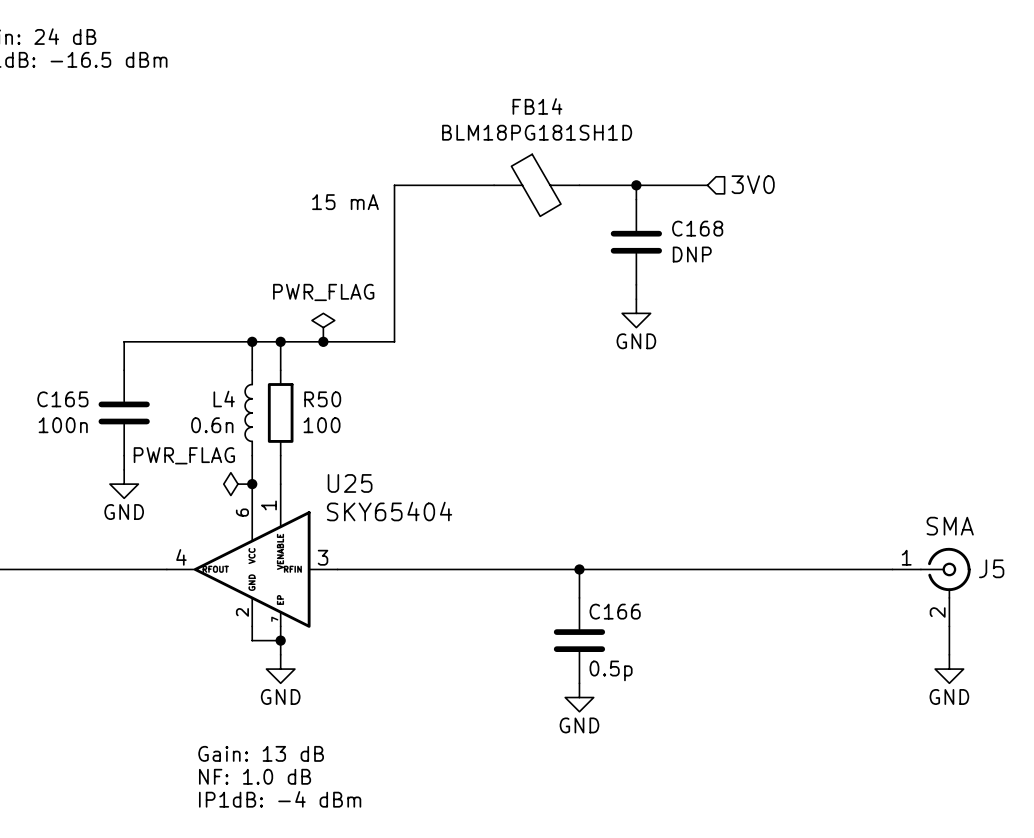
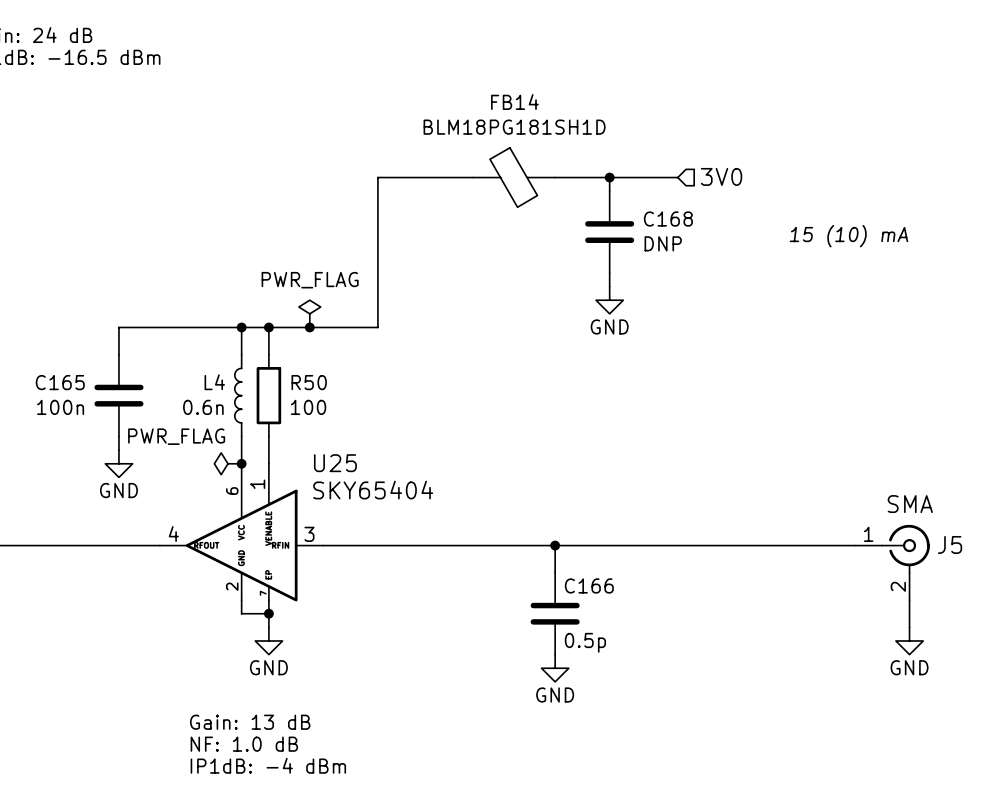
text: 15 mA (345, 202) -> none
text: none -> 15 (10) mA (848, 236)

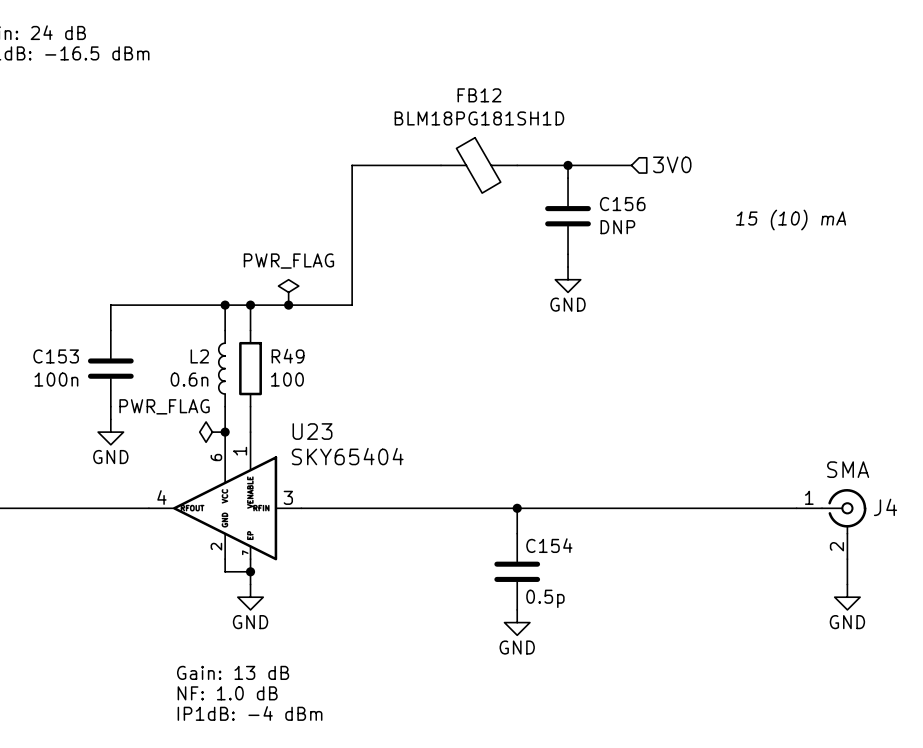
FB14 name: FB14 (514, 102) -> FB12 (479, 95)
C168 name: C168 (668, 219) -> C156 (622, 204)
C165 name: C165 (60, 382) -> C153 (56, 356)
L4 name: L4 (214, 382) -> L2 (199, 356)
R50 name: R50 (309, 382) -> R49 (288, 356)
U25 name: U25 (335, 463) -> U23 (312, 431)
J5 name: J5 (950, 544) -> J4 (885, 507)
C166 name: C166 (589, 585) -> C154 (549, 545)

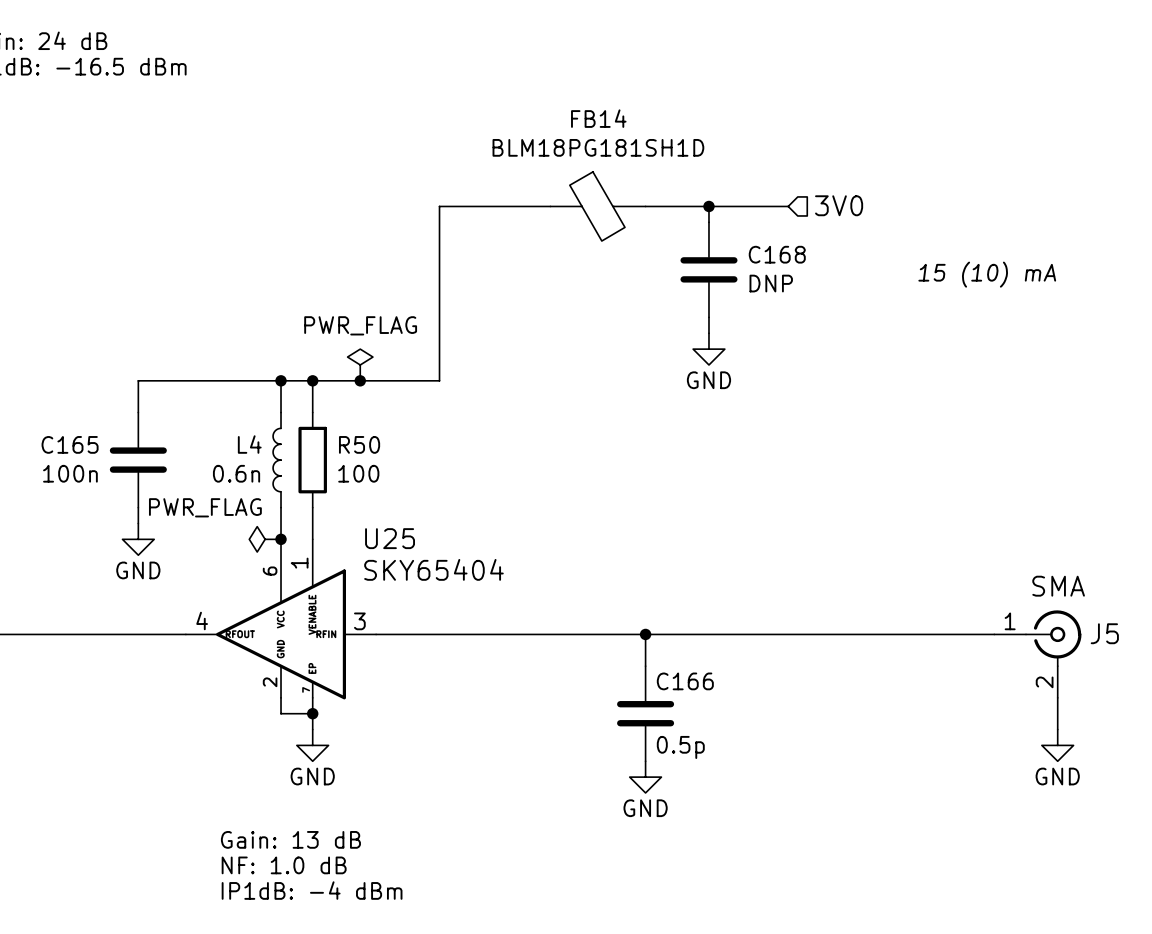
FB12 name: FB12 (479, 95) -> FB14 (598, 118)
C156 name: C156 (622, 204) -> C168 (777, 254)
C153 name: C153 (56, 356) -> C165 (70, 444)
L2 name: L2 (199, 356) -> L4 (249, 444)
R49 name: R49 (288, 356) -> R50 (359, 444)
U23 name: U23 (312, 431) -> U25 (390, 538)
J4 name: J4 (885, 507) -> J5 (1104, 633)
C154 name: C154 (549, 545) -> C166 (685, 681)

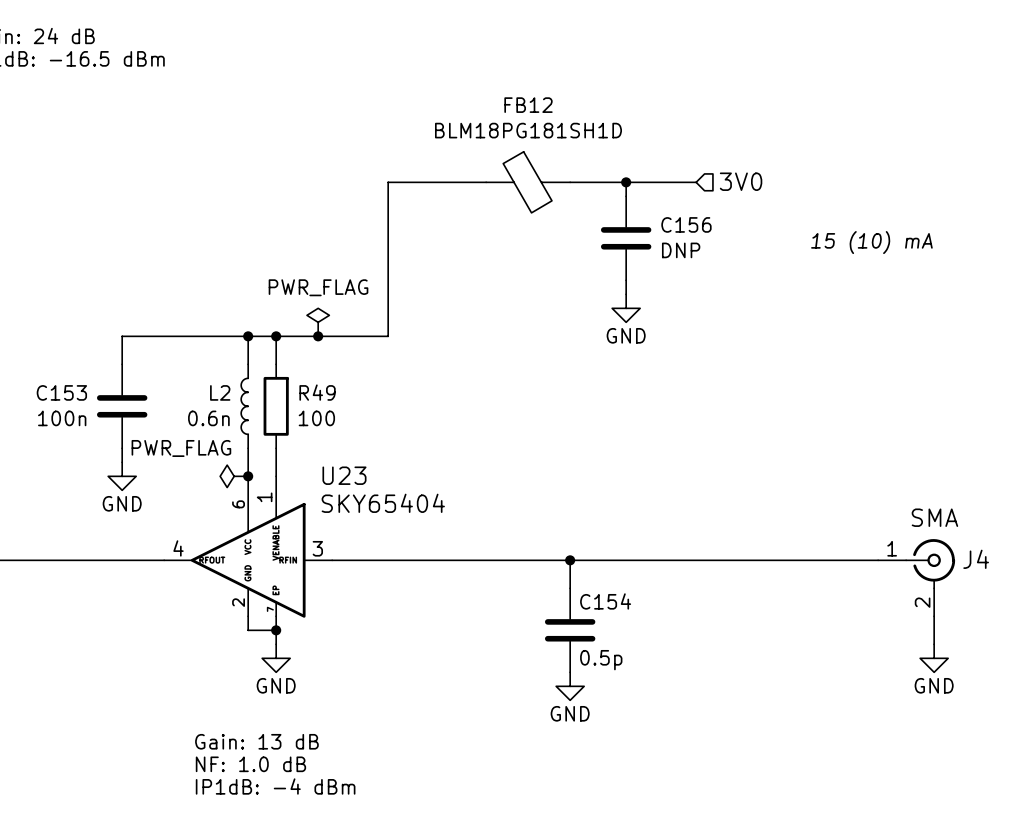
FB14 name: FB14 (598, 118) -> FB12 (528, 105)
C168 name: C168 (777, 254) -> C156 (686, 224)
C165 name: C165 (70, 444) -> C153 (61, 392)
L4 name: L4 (249, 444) -> L2 (220, 392)
R50 name: R50 (359, 444) -> R49 (317, 392)
U25 name: U25 (390, 538) -> U23 (344, 475)
J5 name: J5 (1104, 633) -> J4 (976, 559)
C166 name: C166 (685, 681) -> C154 (605, 601)

